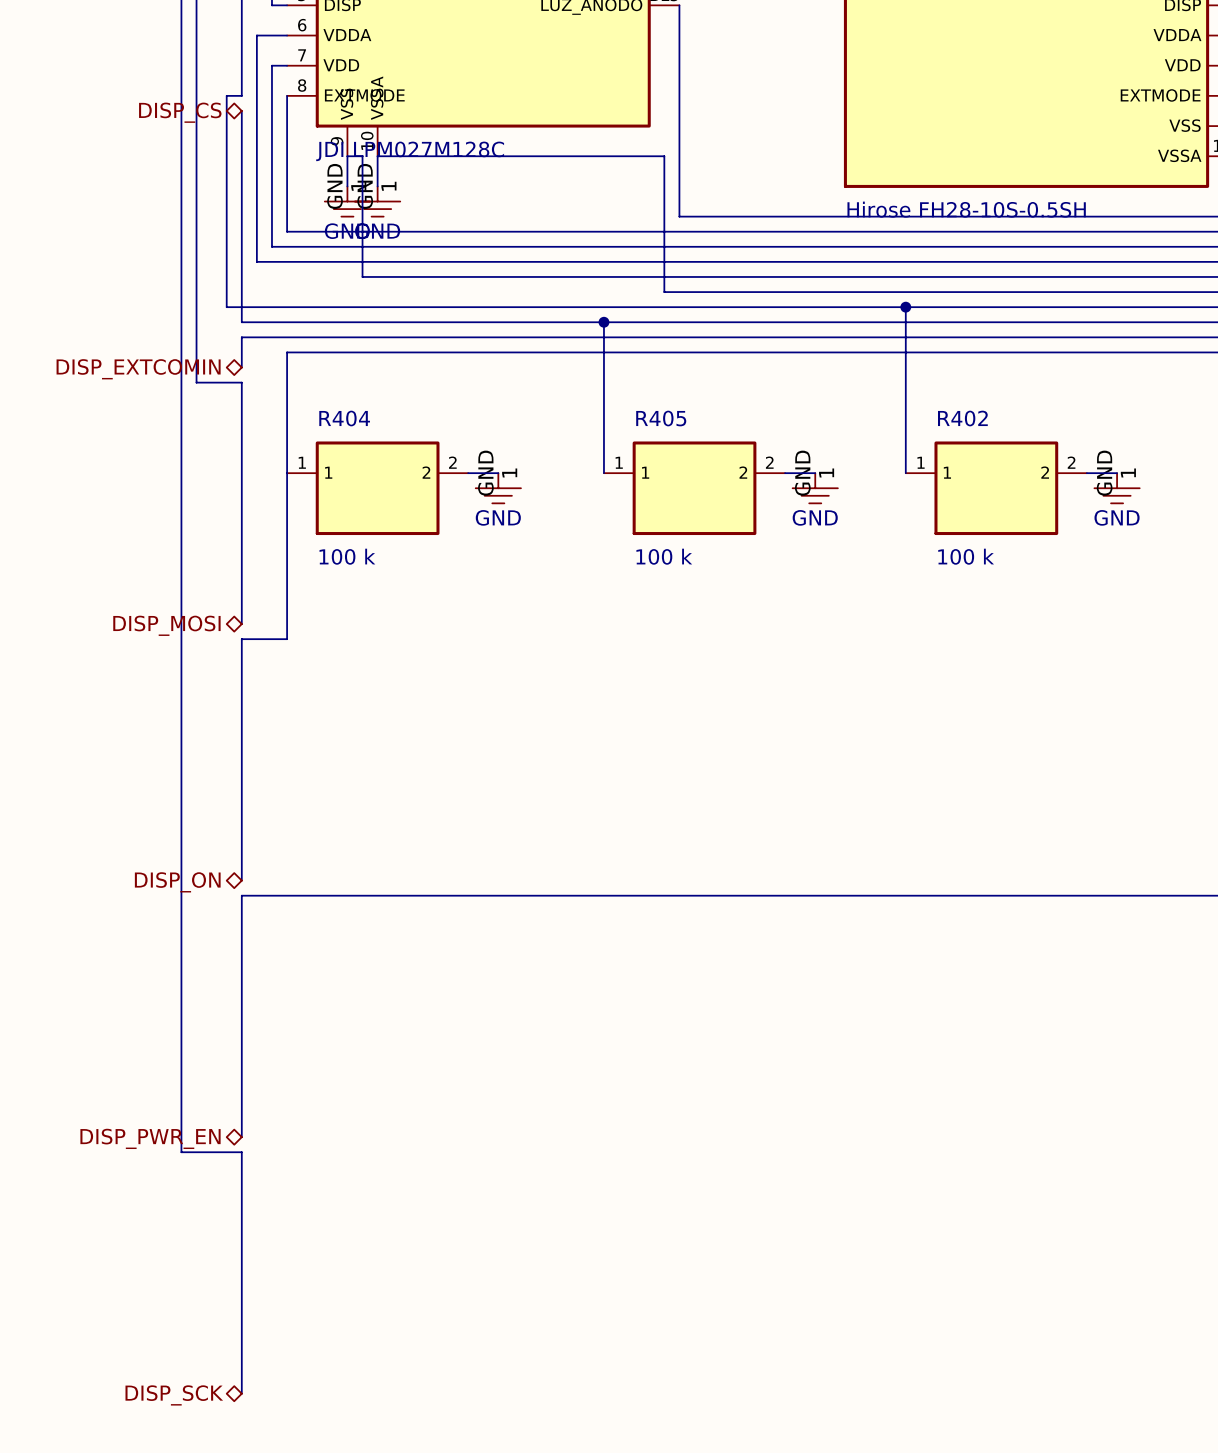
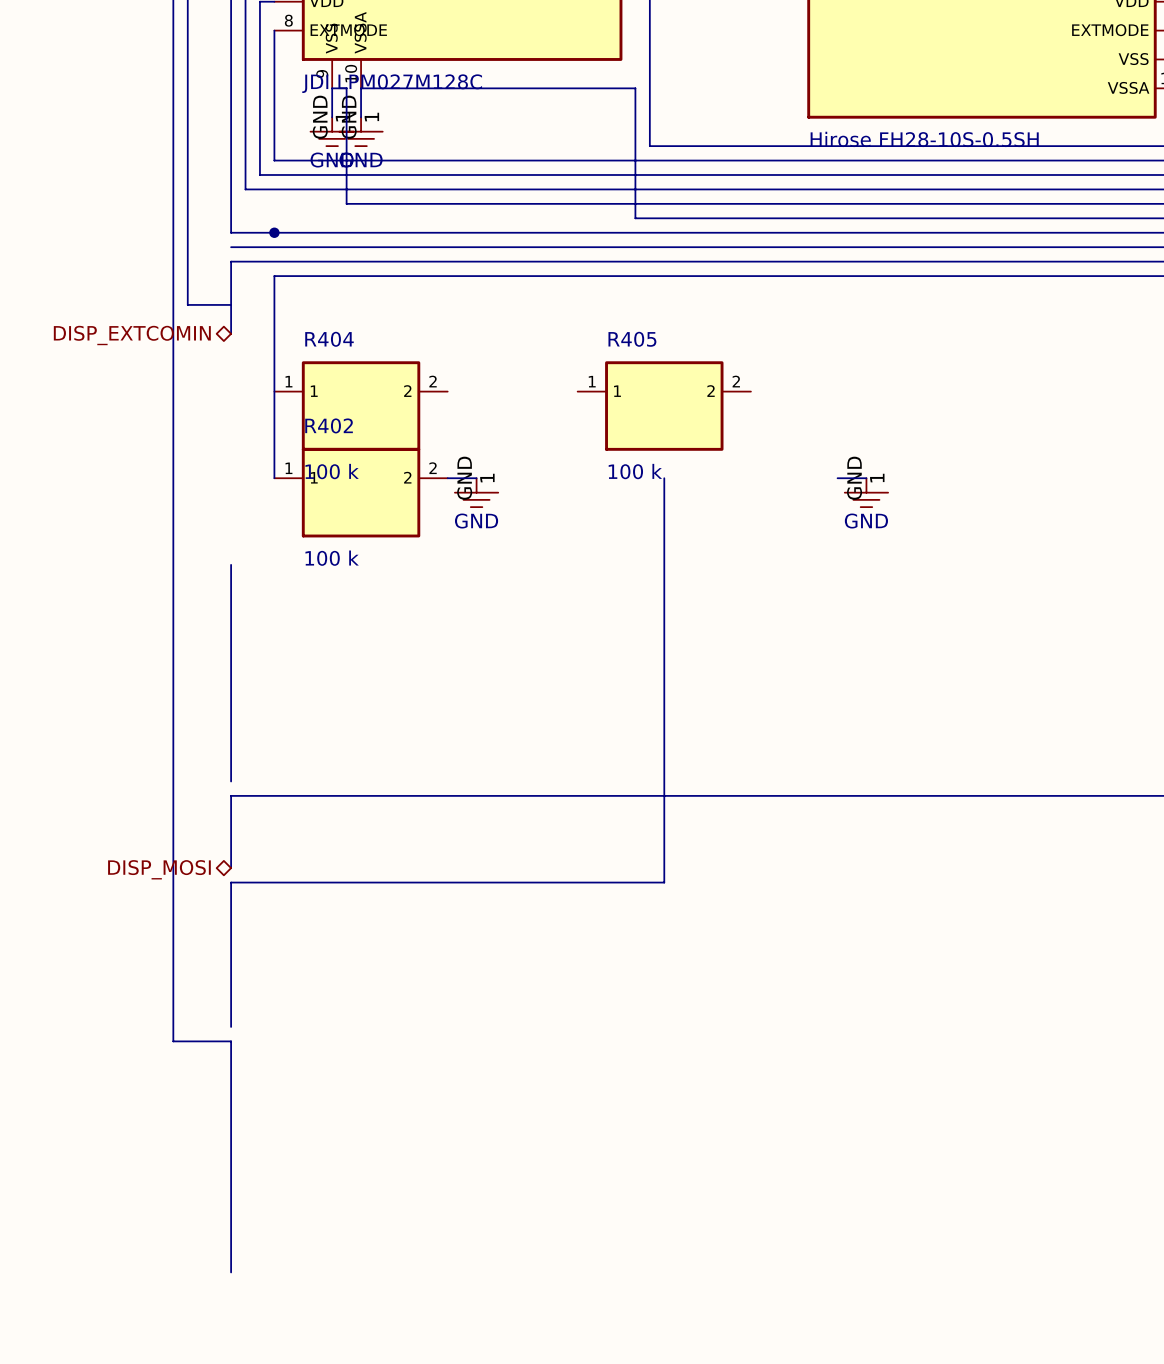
wire: (241, 95) (226, 95) (226, 307) (241, 307) (241, 322) -> (231, 30) (231, 45)
hierarchical label: DISP_CS (180, 112) -> none
junction: none -> (274, 232)
wire: (905, 307) (905, 473) -> none
junction: (905, 307) -> none
wire: (603, 322) (603, 473) -> none
junction: (603, 322) -> none
wire: none -> (231, 290) (231, 304)
hierarchical label position: DISP_EXTCOMIN (138, 369) -> DISP_EXTCOMIN (132, 335)
wire: (241, 412) (241, 624) -> none
wire: (468, 473) (498, 473) -> (447, 478) (476, 478)
wire: (785, 473) (815, 473) -> (837, 478) (866, 478)
wire: (1086, 473) (1117, 473) -> none
power symbol position: GND (498, 488) -> GND (476, 492)
power symbol: GND (815, 488) -> none
R402 position: (996, 488) -> (361, 492)
power symbol: GND (1117, 488) -> none
wire: (287, 563) (287, 639) (241, 639) (241, 654) -> none
power symbol: none -> GND (866, 492)
hierarchical label: DISP_MOSI (166, 625) -> none
hierarchical label: DISP_ON (177, 882) -> none
wire: (241, 971) (241, 986) -> (664, 478) (664, 882) (231, 882)
hierarchical label: none -> DISP_MOSI (159, 869)
hierarchical label: DISP_PWR_EN (150, 1138) -> none
hierarchical label: DISP_SCK (174, 1395) -> none

